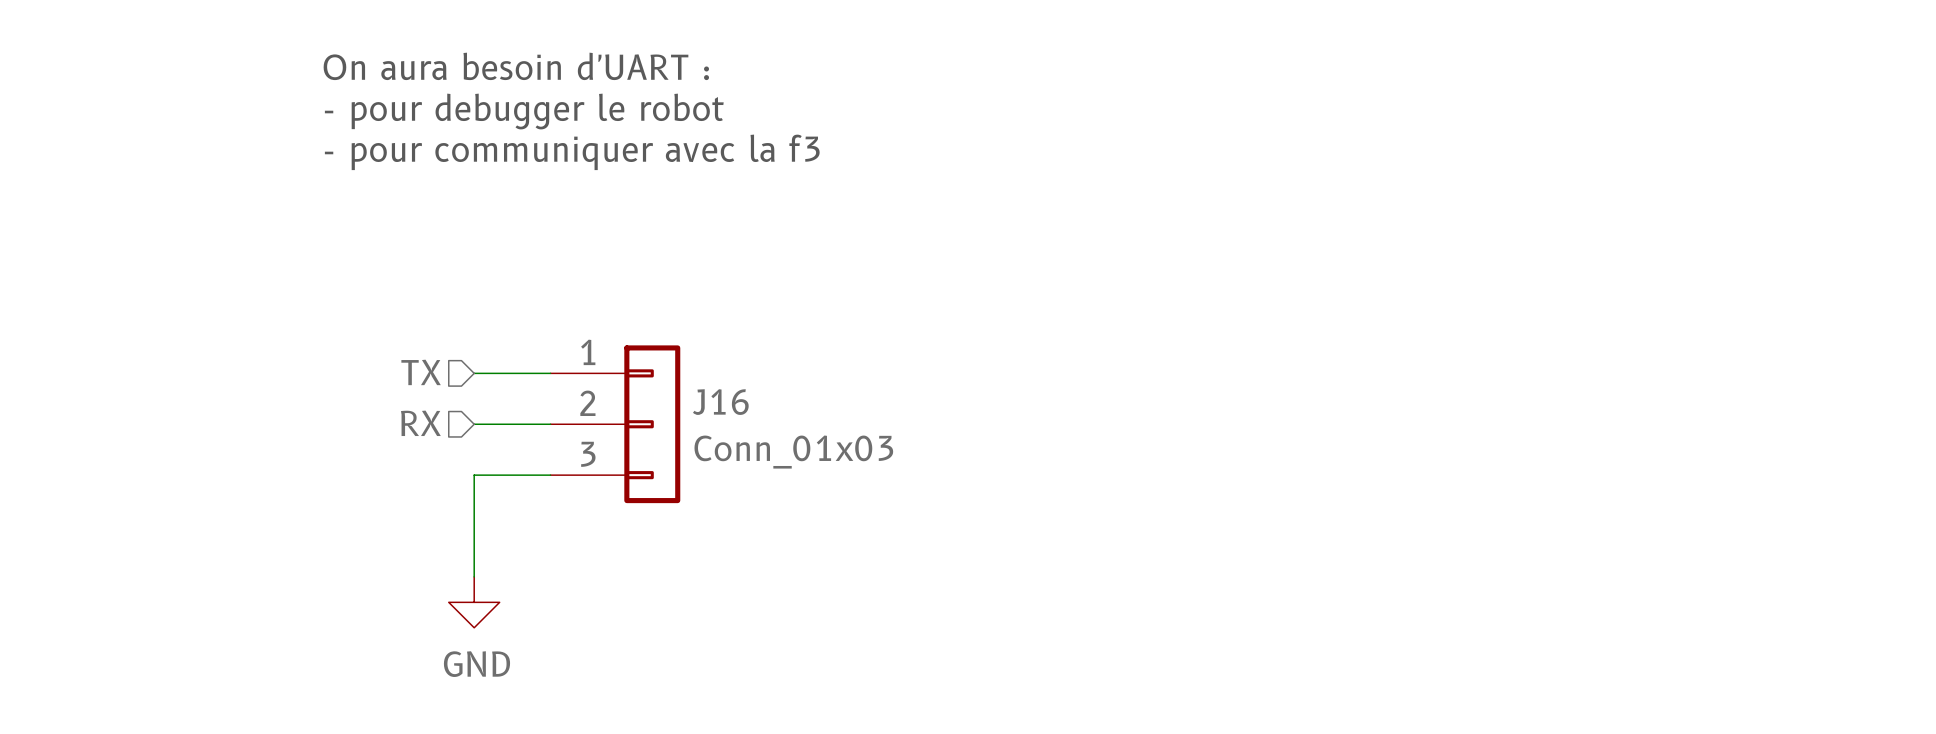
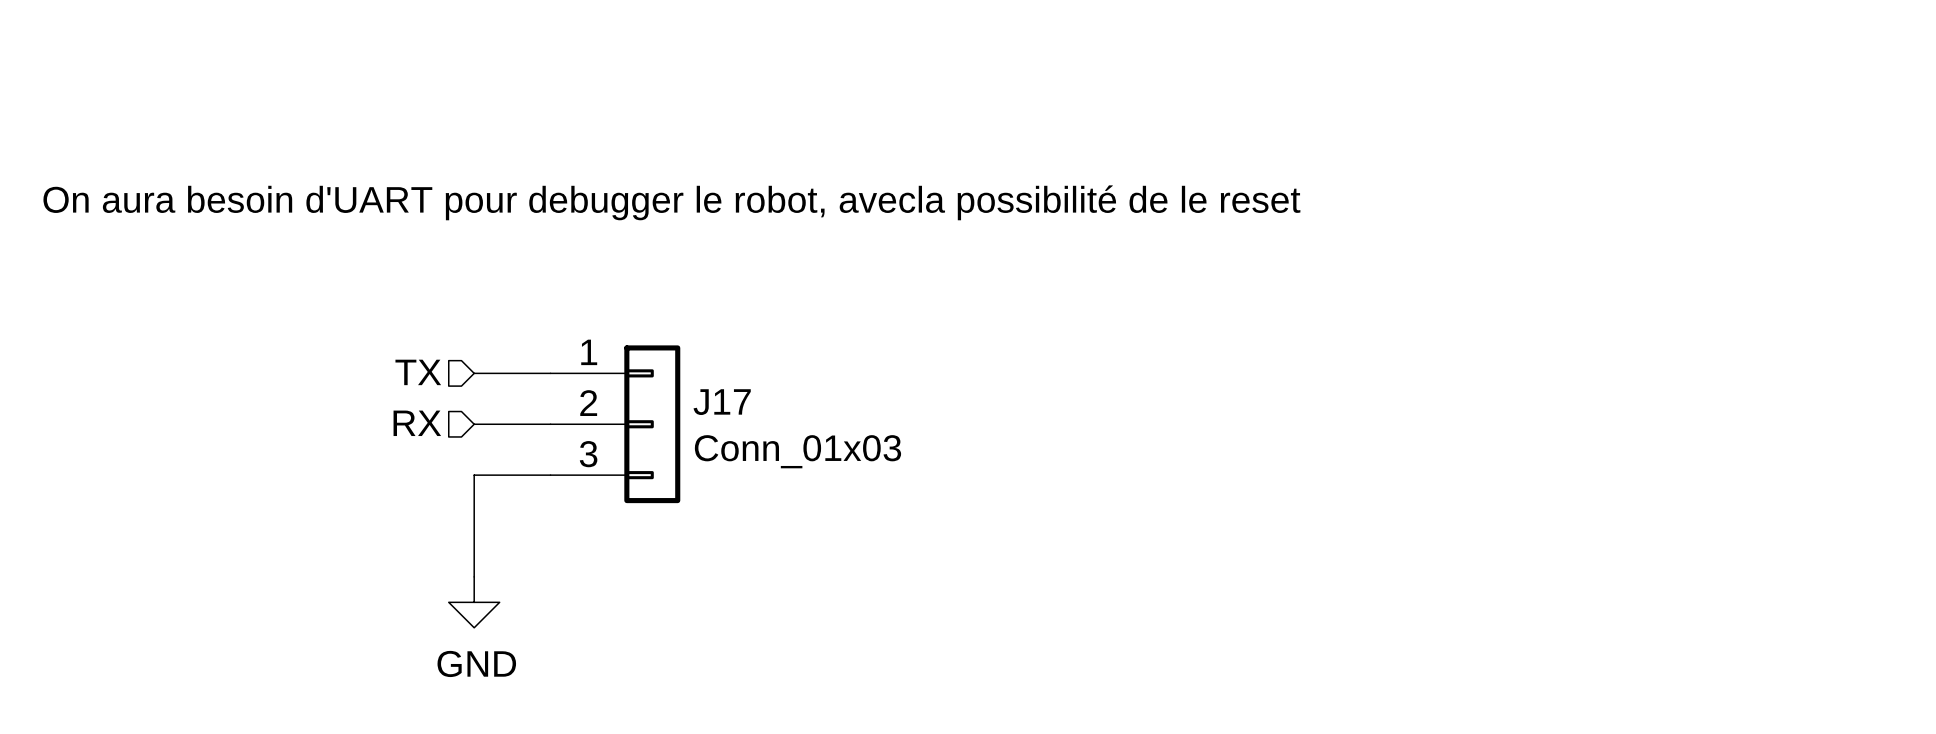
text: On aura besoin d'UART : (516, 66) -> none
text: - pour debugger le robot (524, 111) -> none
text: - pour communiquer avec la f3 (572, 152) -> none
text: none -> On aura besoin d'UART pour debugger le robot, avecla possibilité de le reset (671, 202)
J16 name: J16 (720, 402) -> J17 (722, 402)

